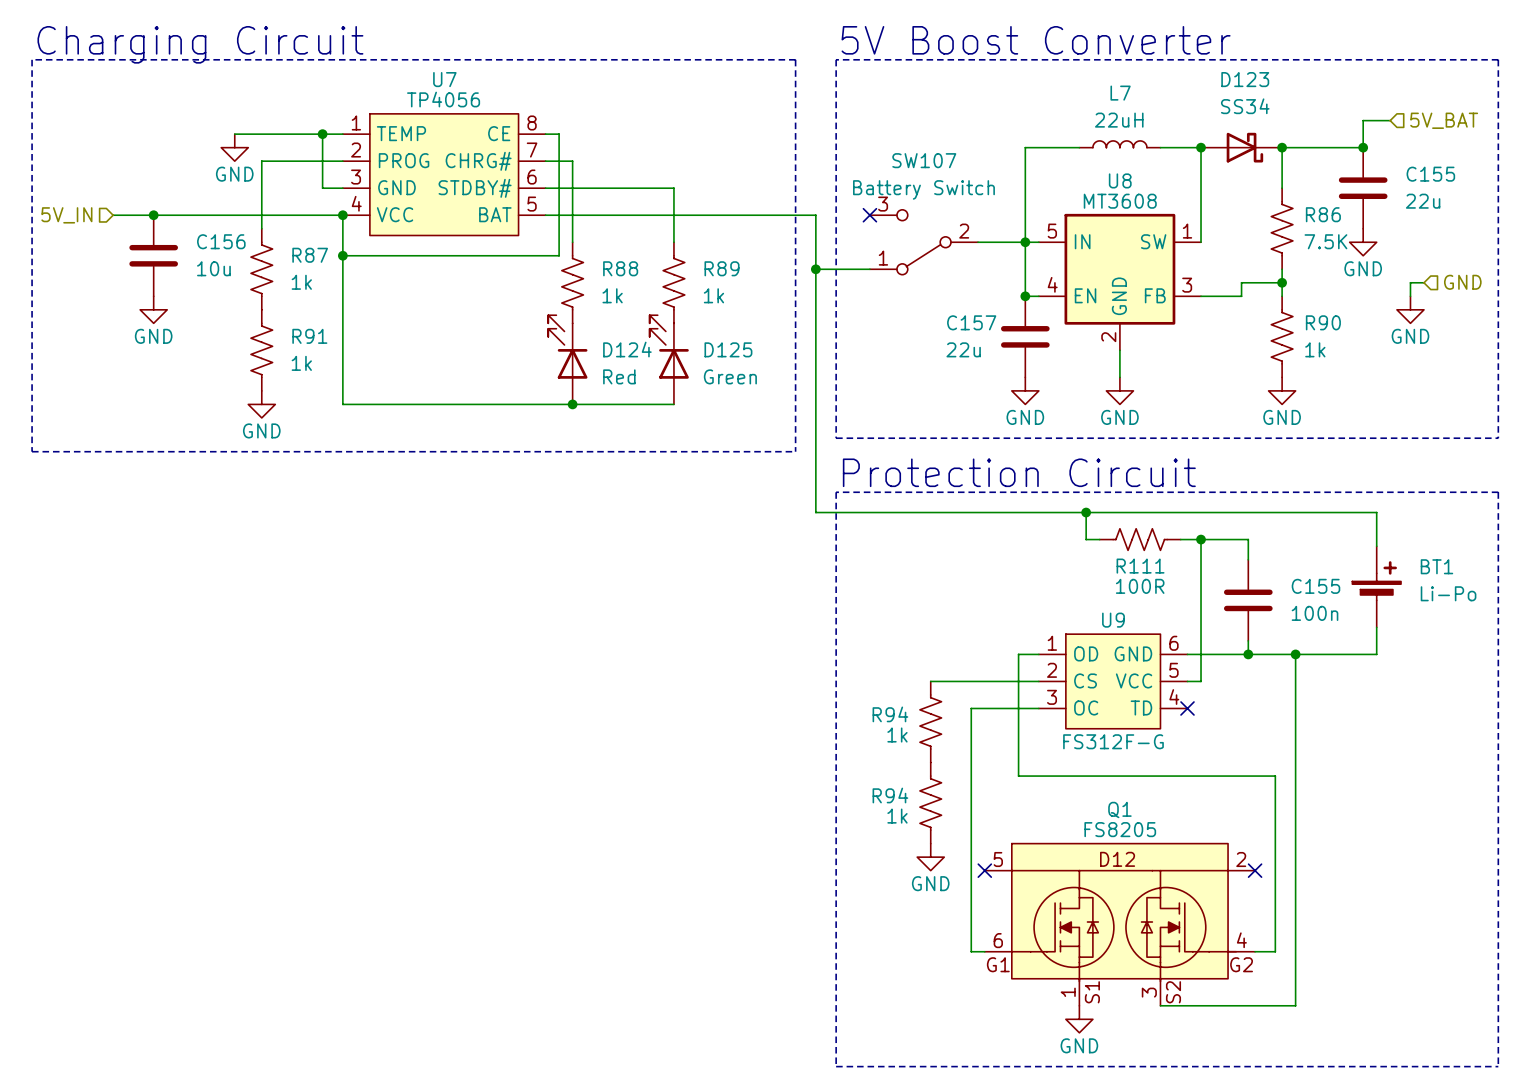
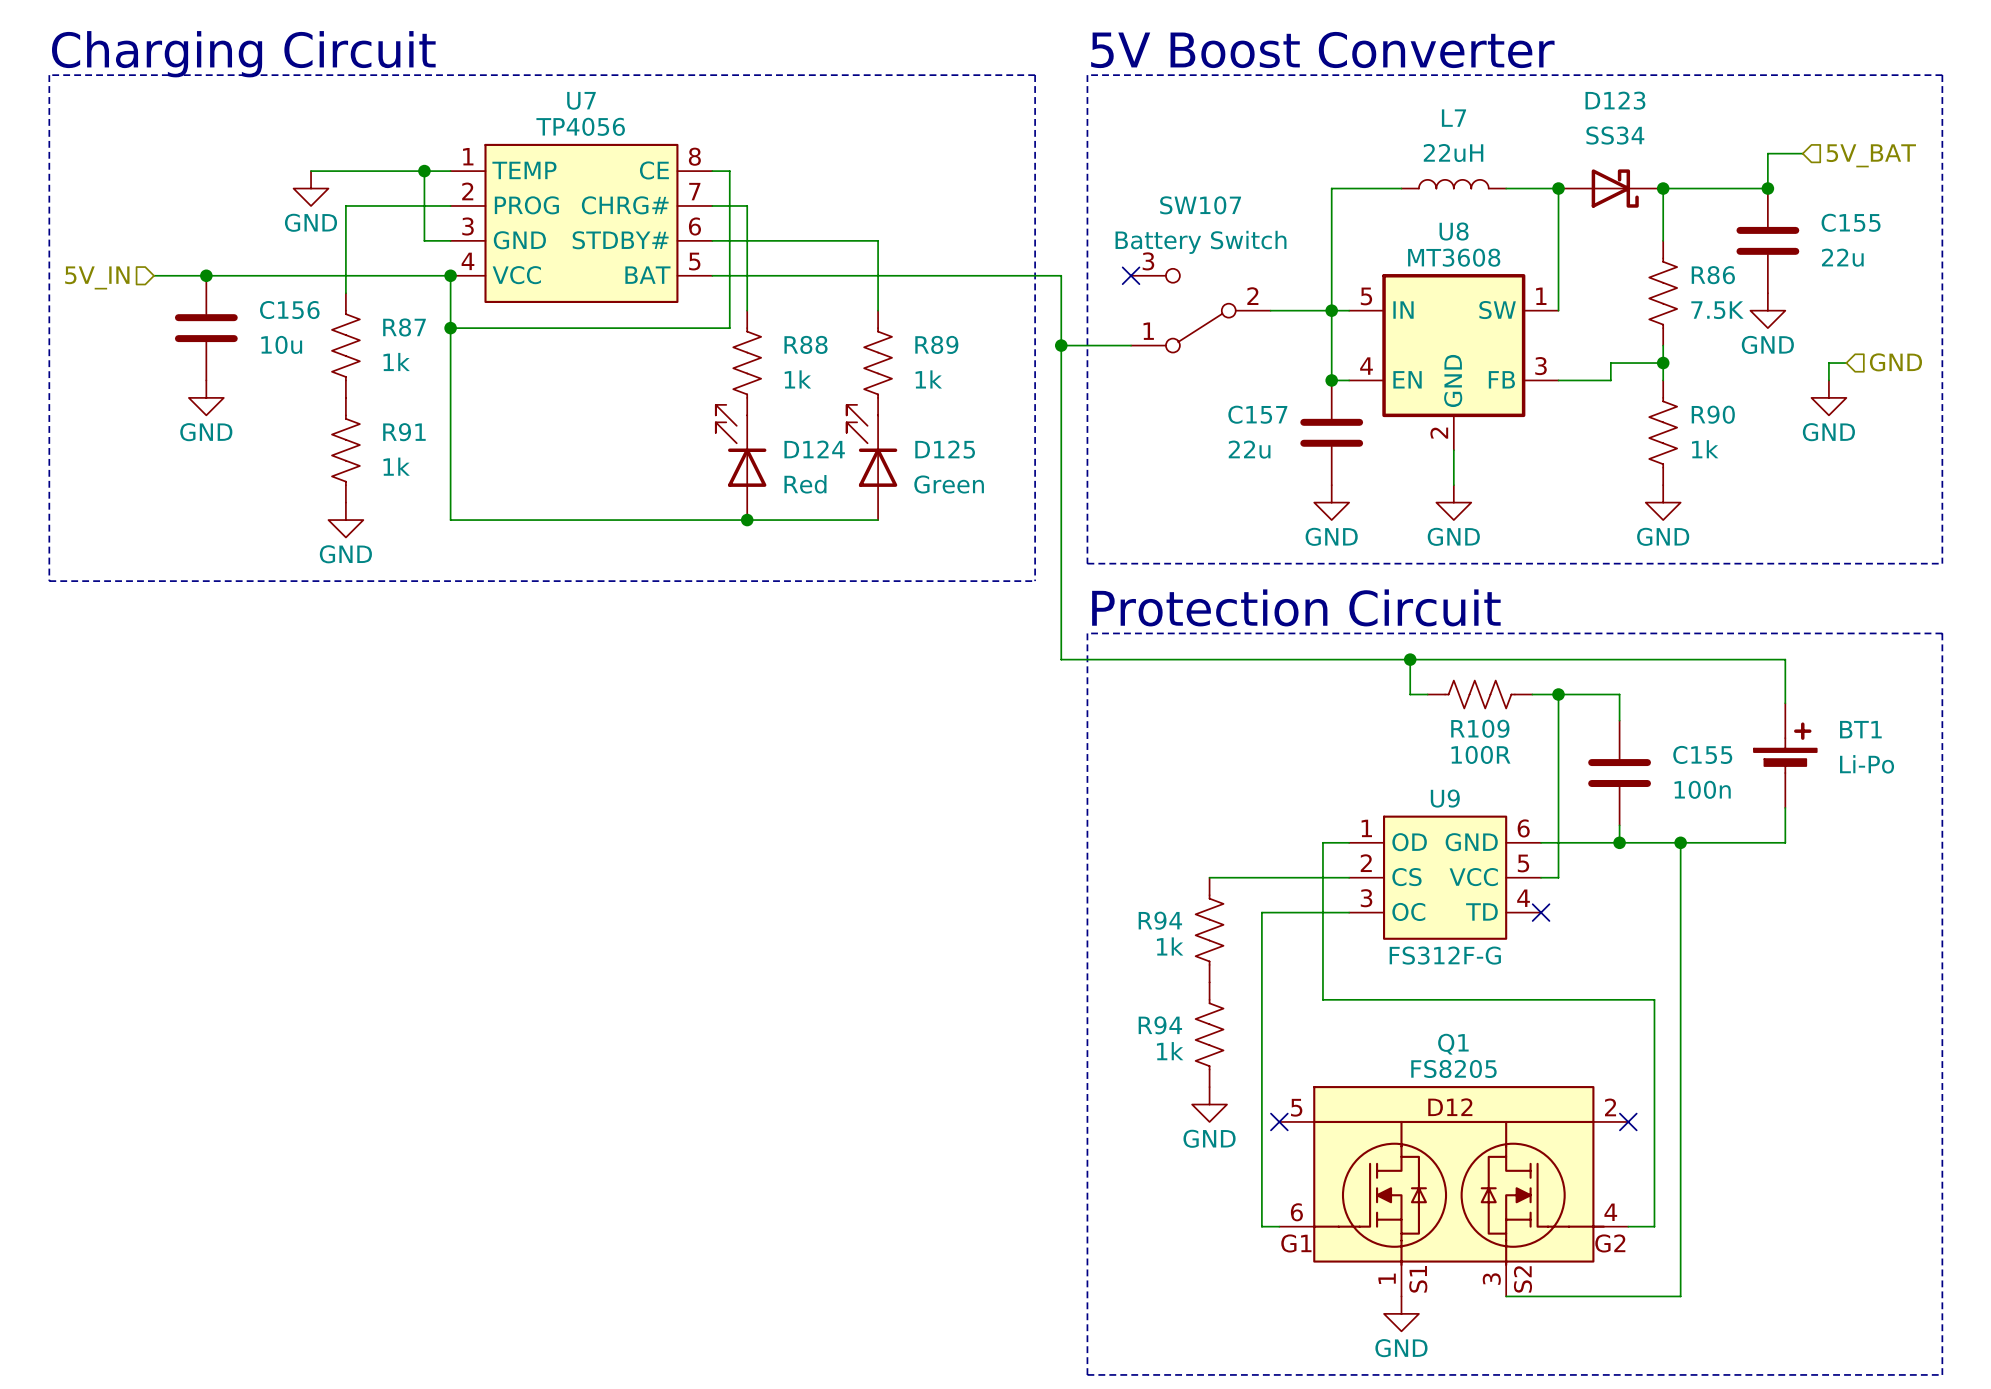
R111 name: R111 (1140, 566) -> R109 (1480, 728)

